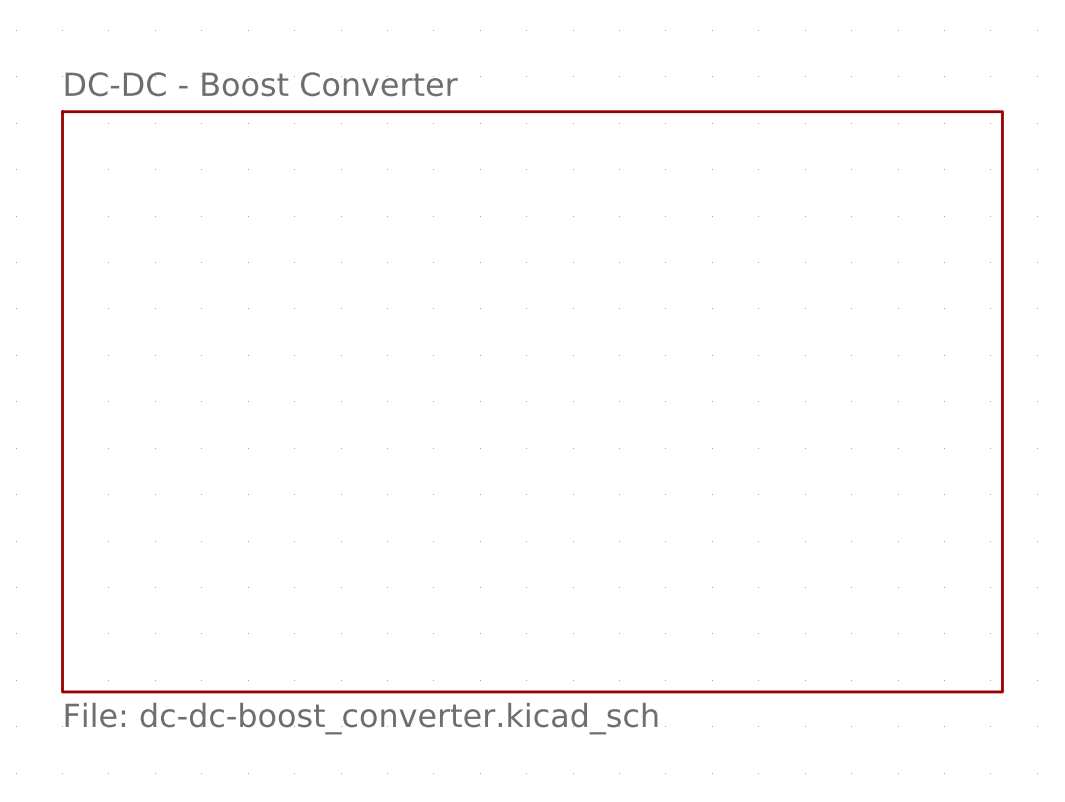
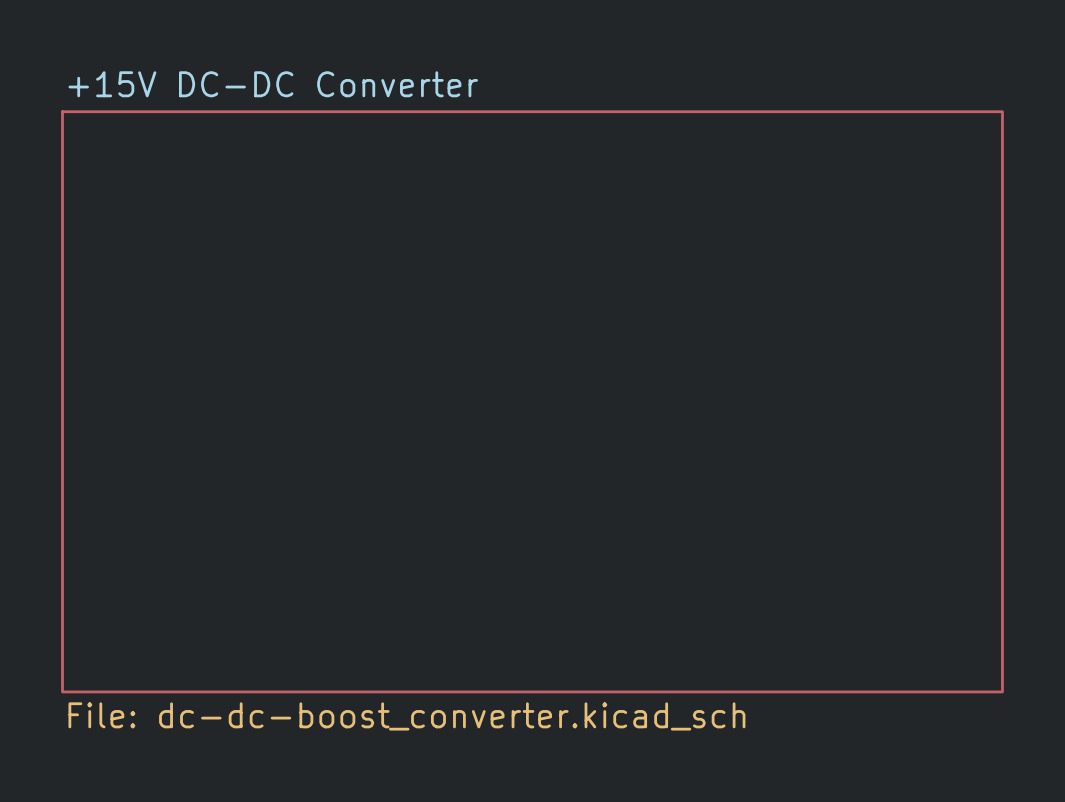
sheet DC-DC - Boost Converter name: DC-DC - Boost Converter (261, 84) -> +15V DC-DC Converter (273, 84)

